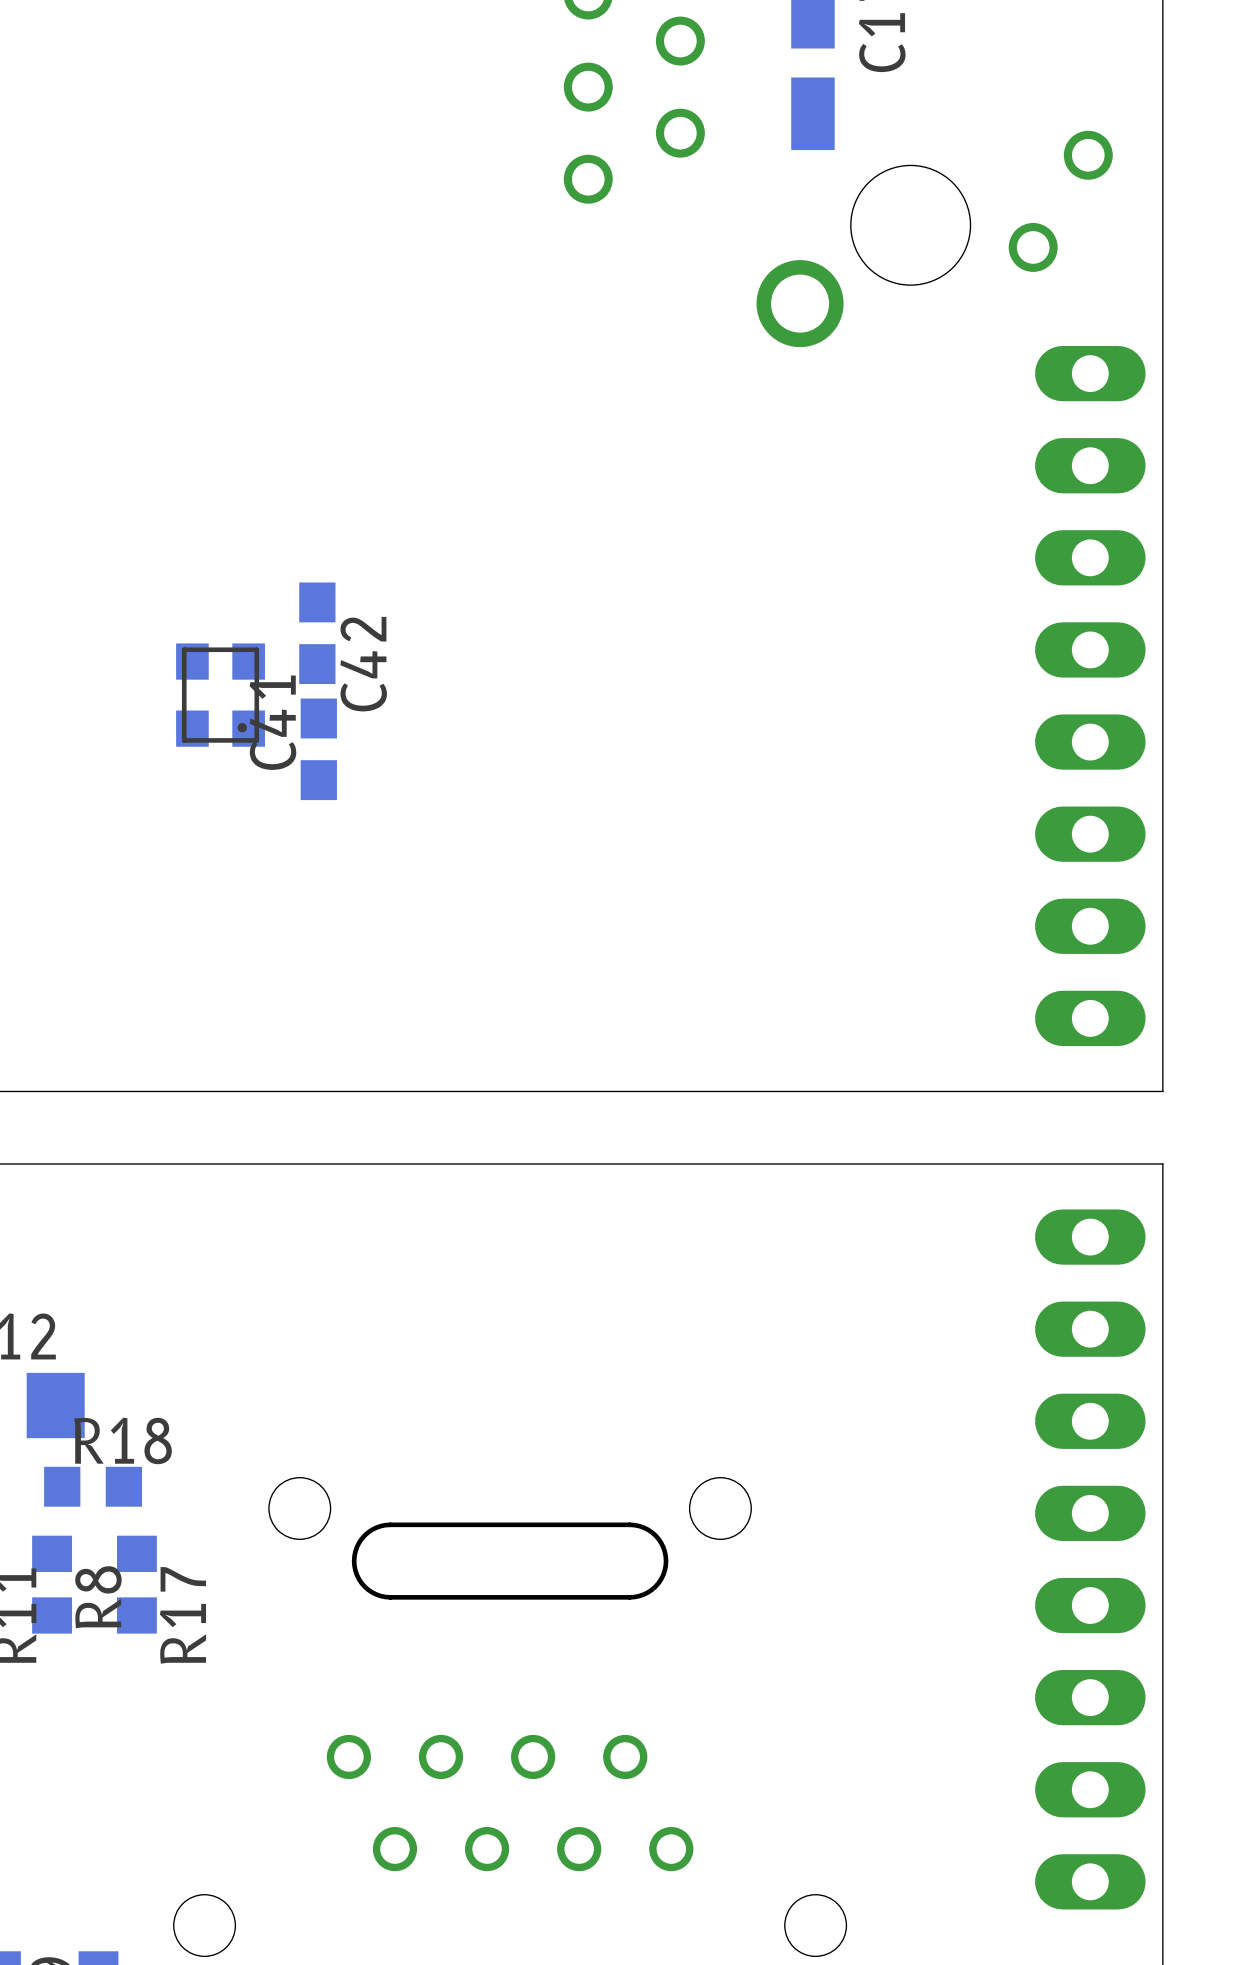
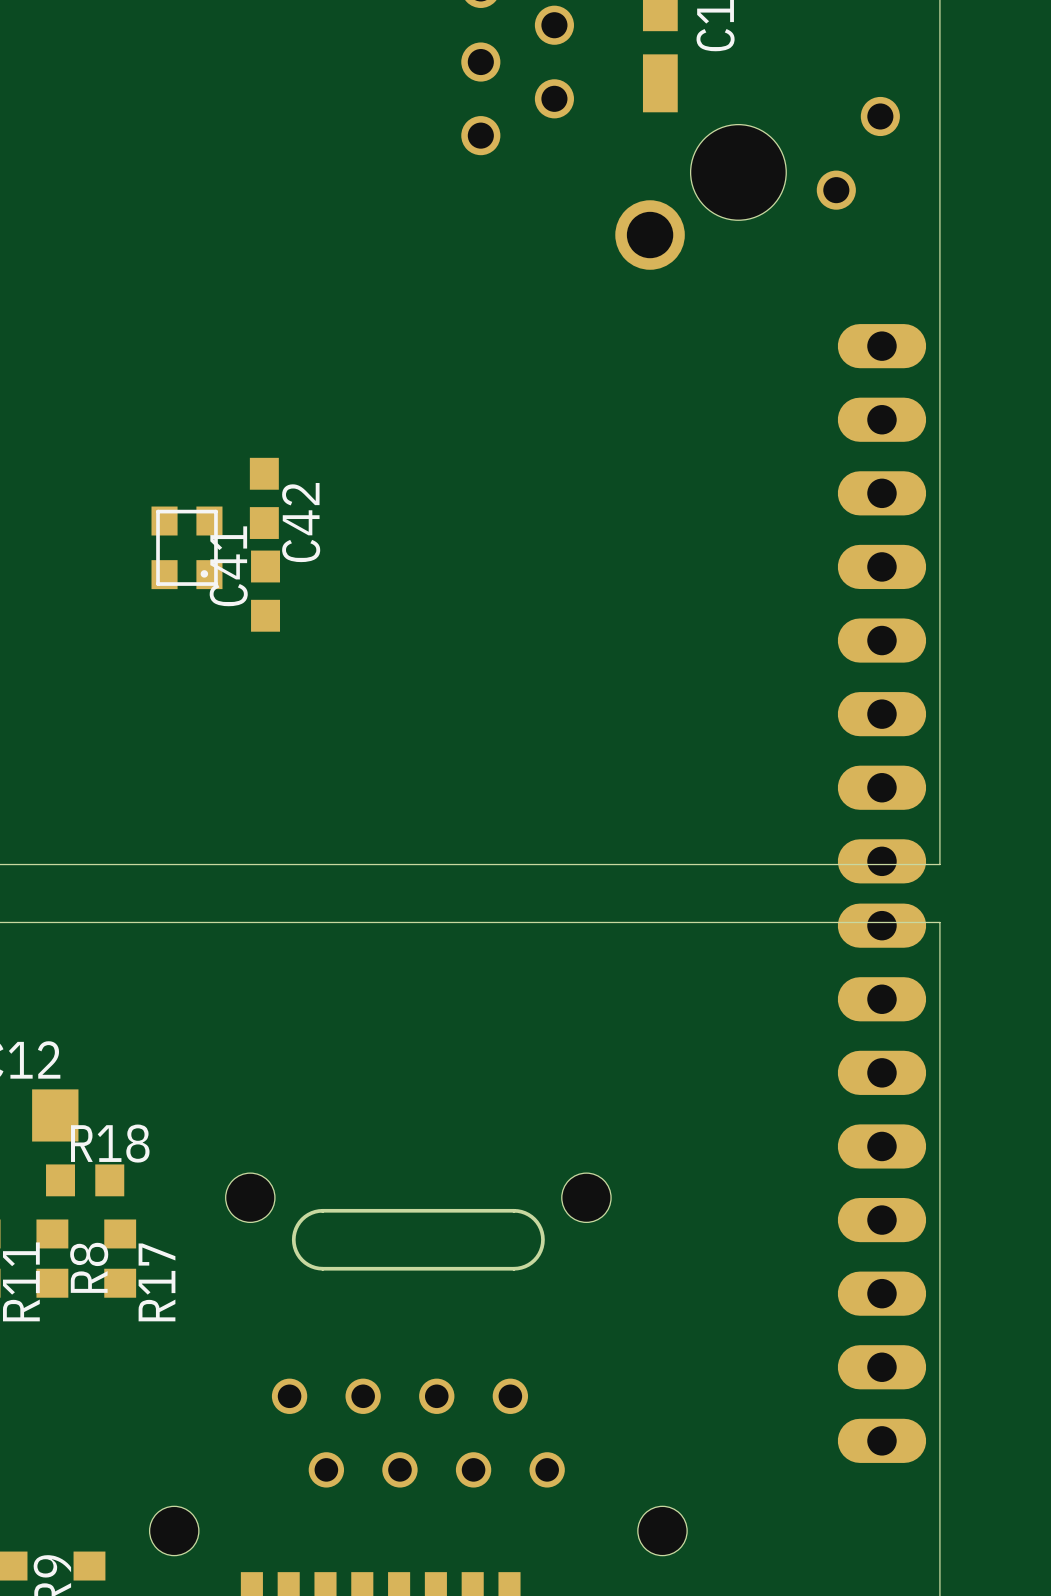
part position: (1090, 695) -> (881, 603)
part position: (1090, 1559) -> (881, 1183)

